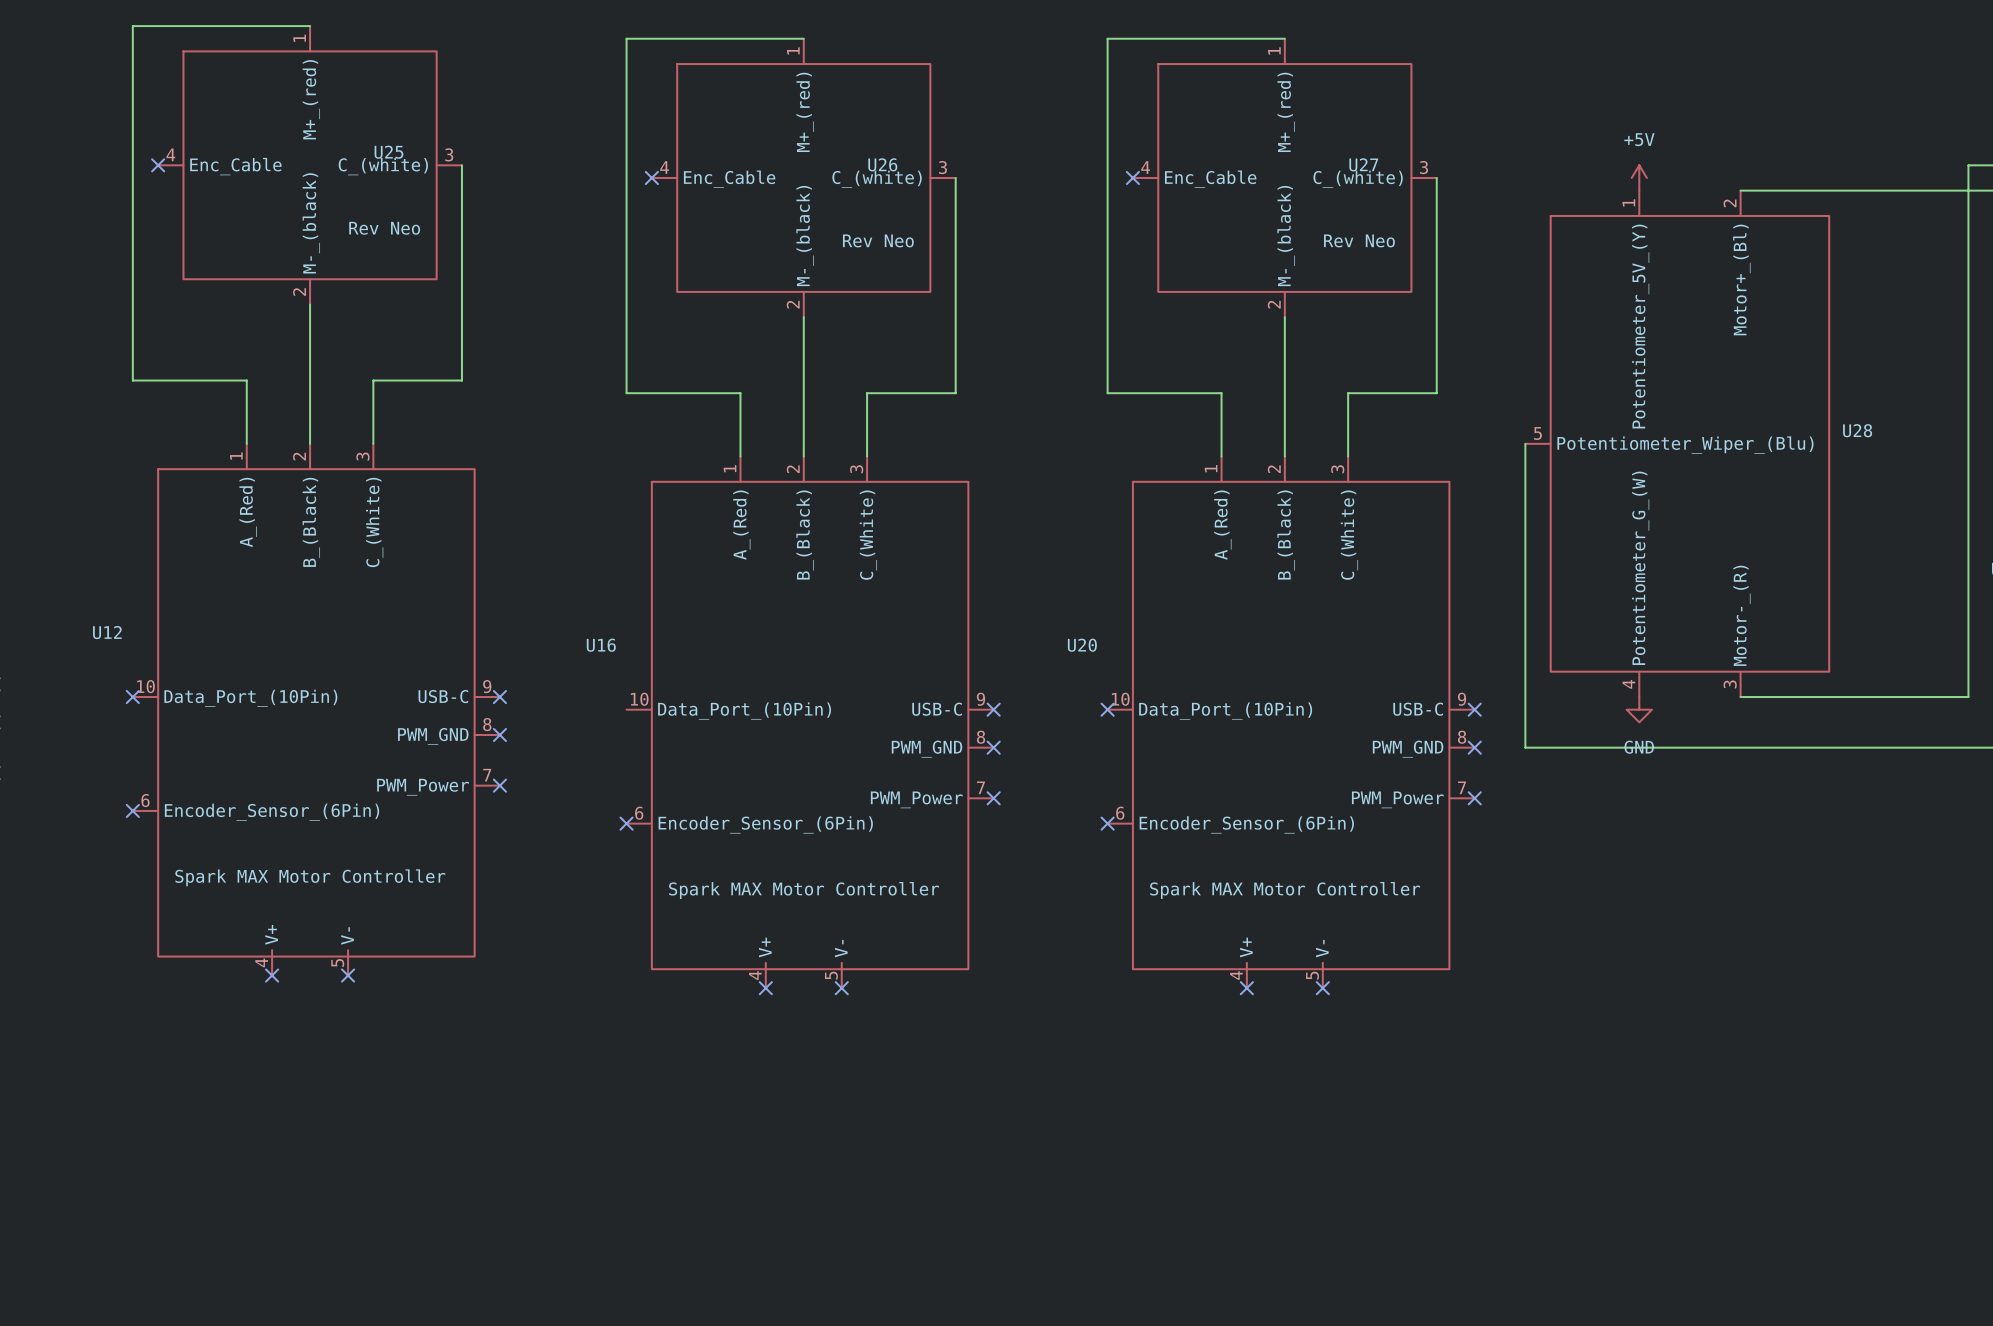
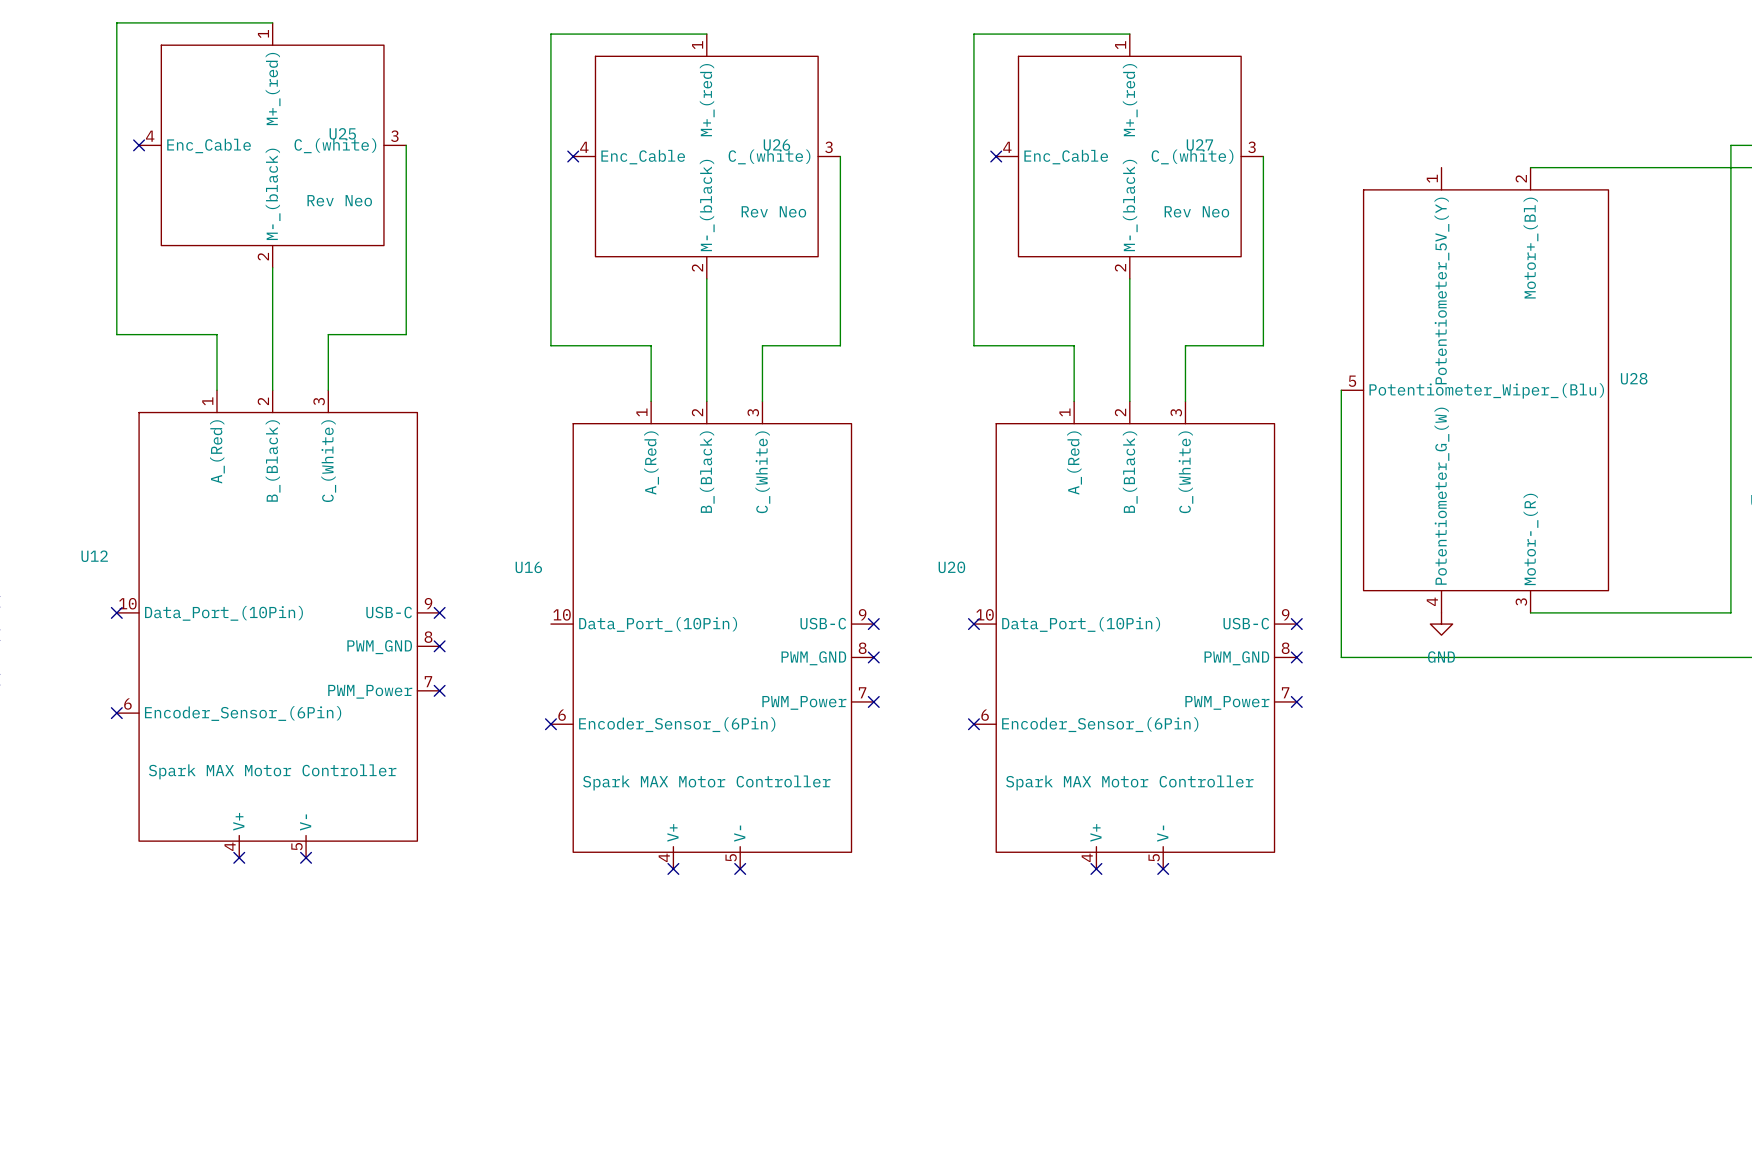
power symbol: +5V (1639, 177) -> none

